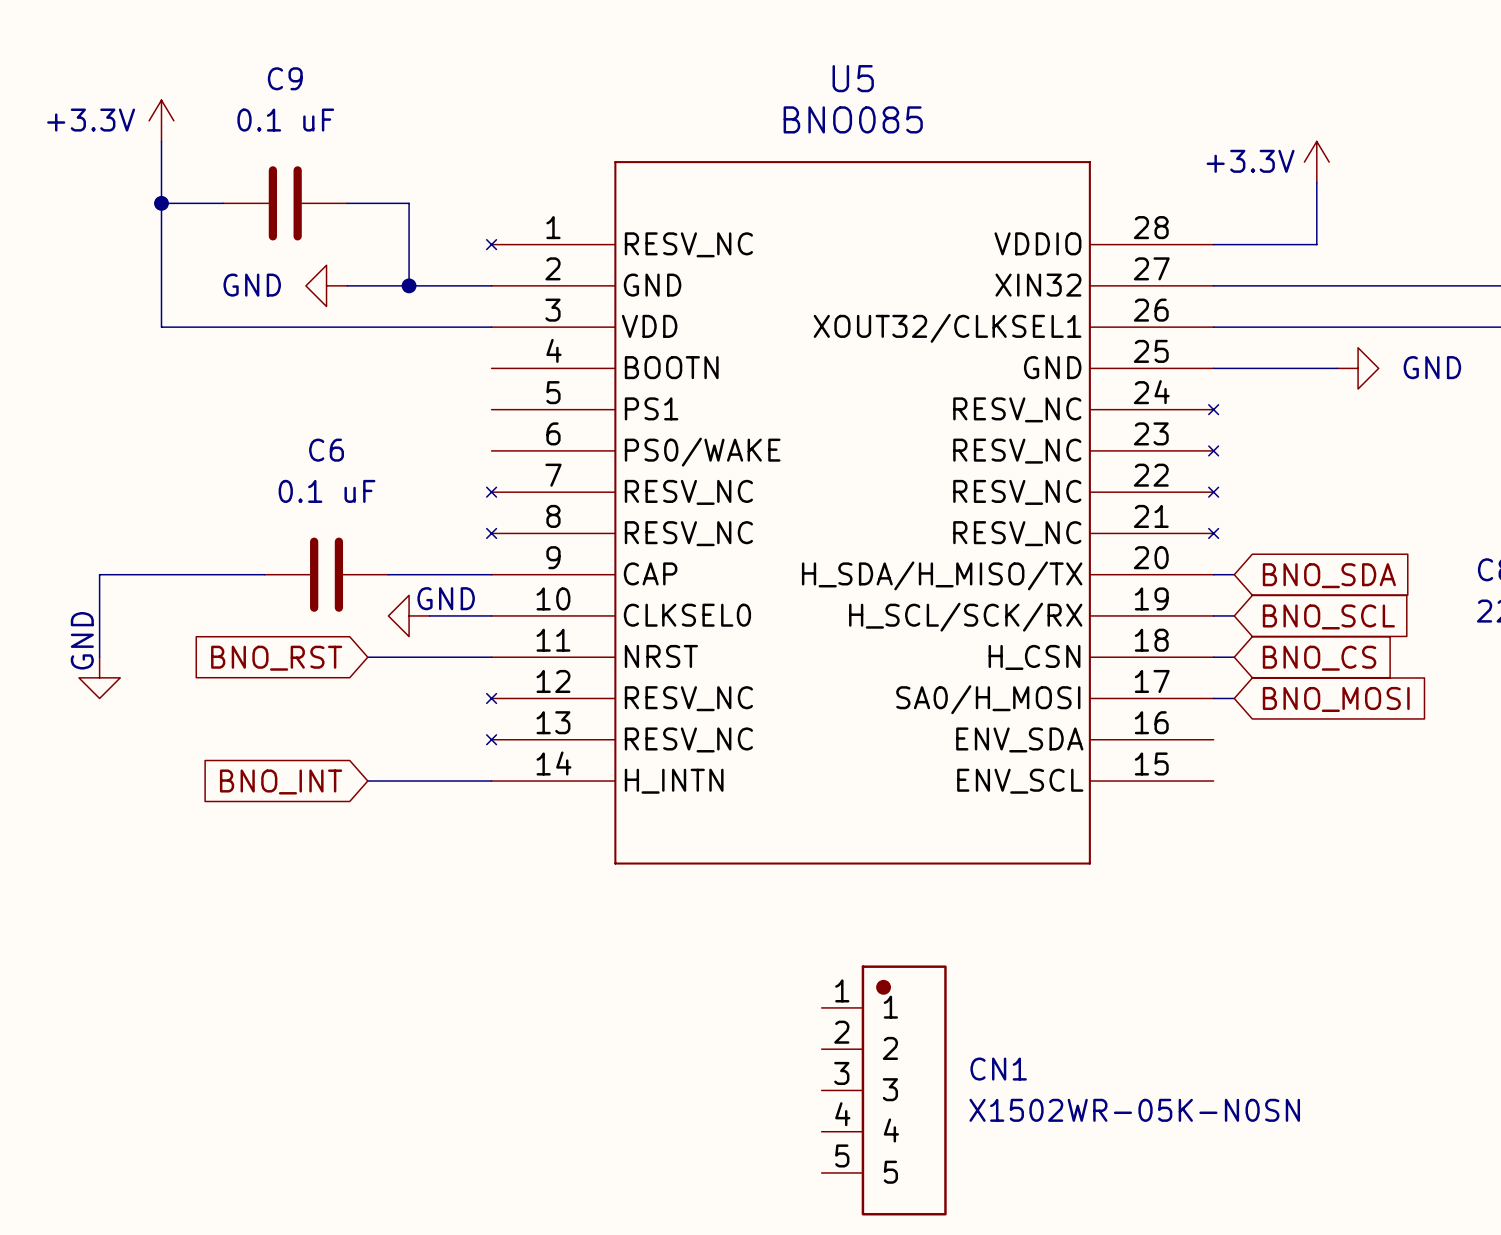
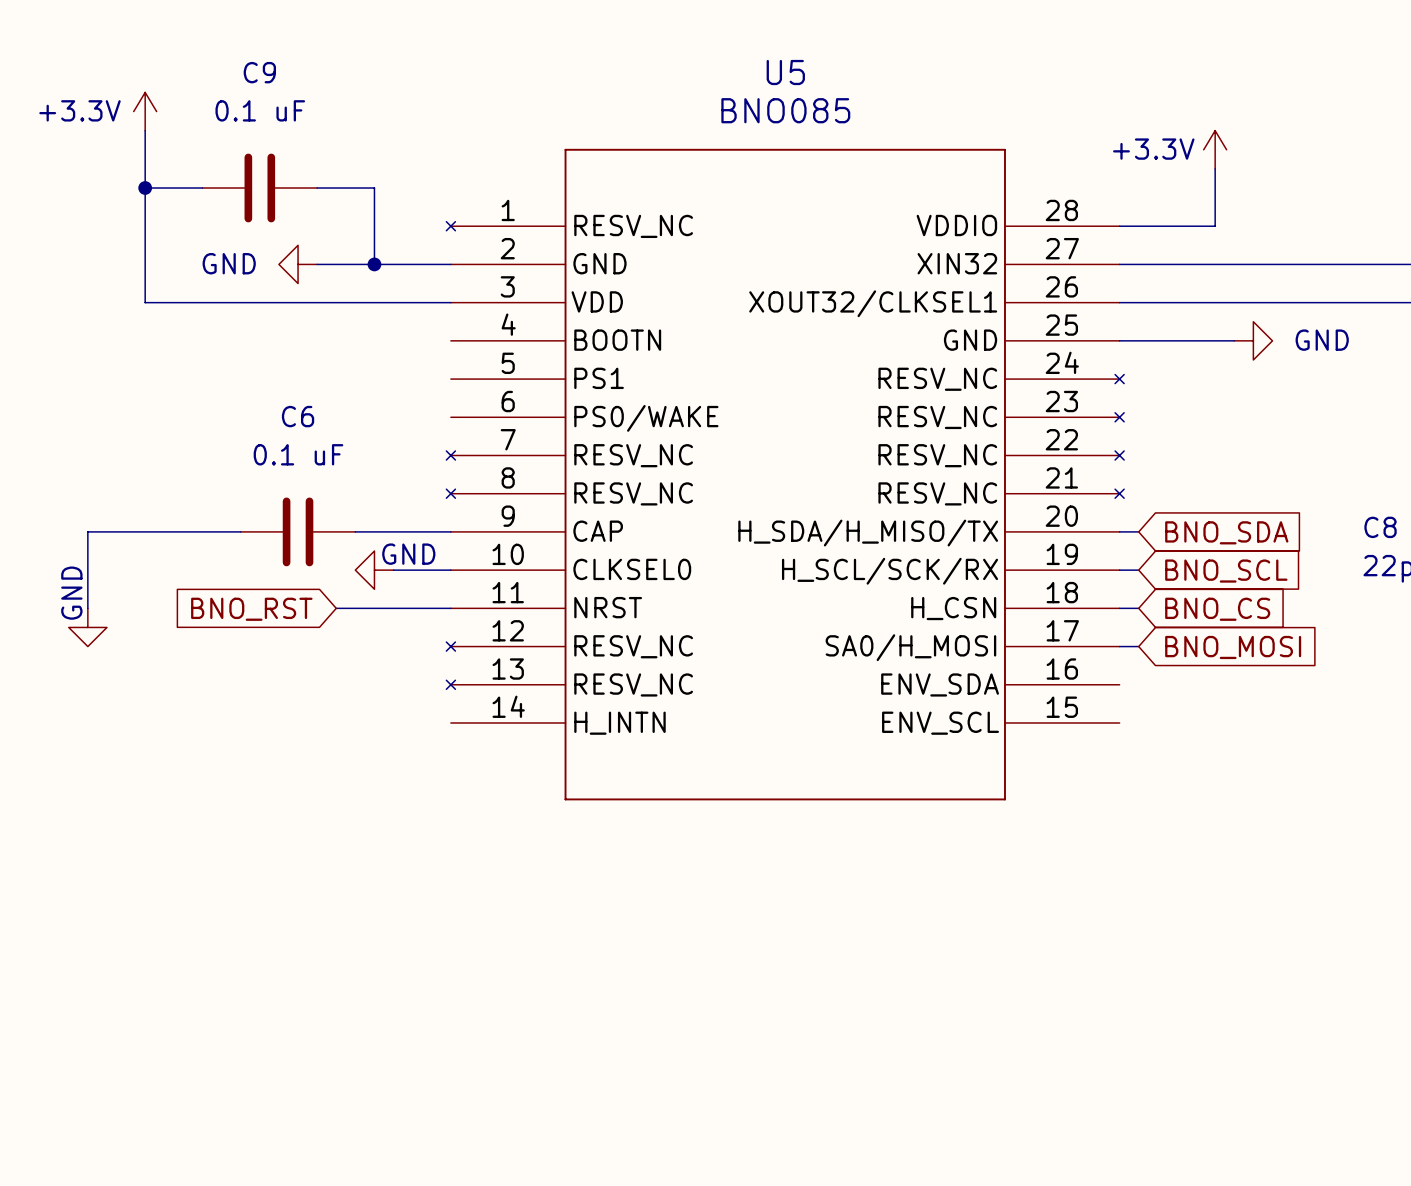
global label: BNO_INT (281, 781) -> none
wire: (367, 781) (491, 781) -> none
CN1: X1502WR-05K-N0SN (884, 1090) -> none

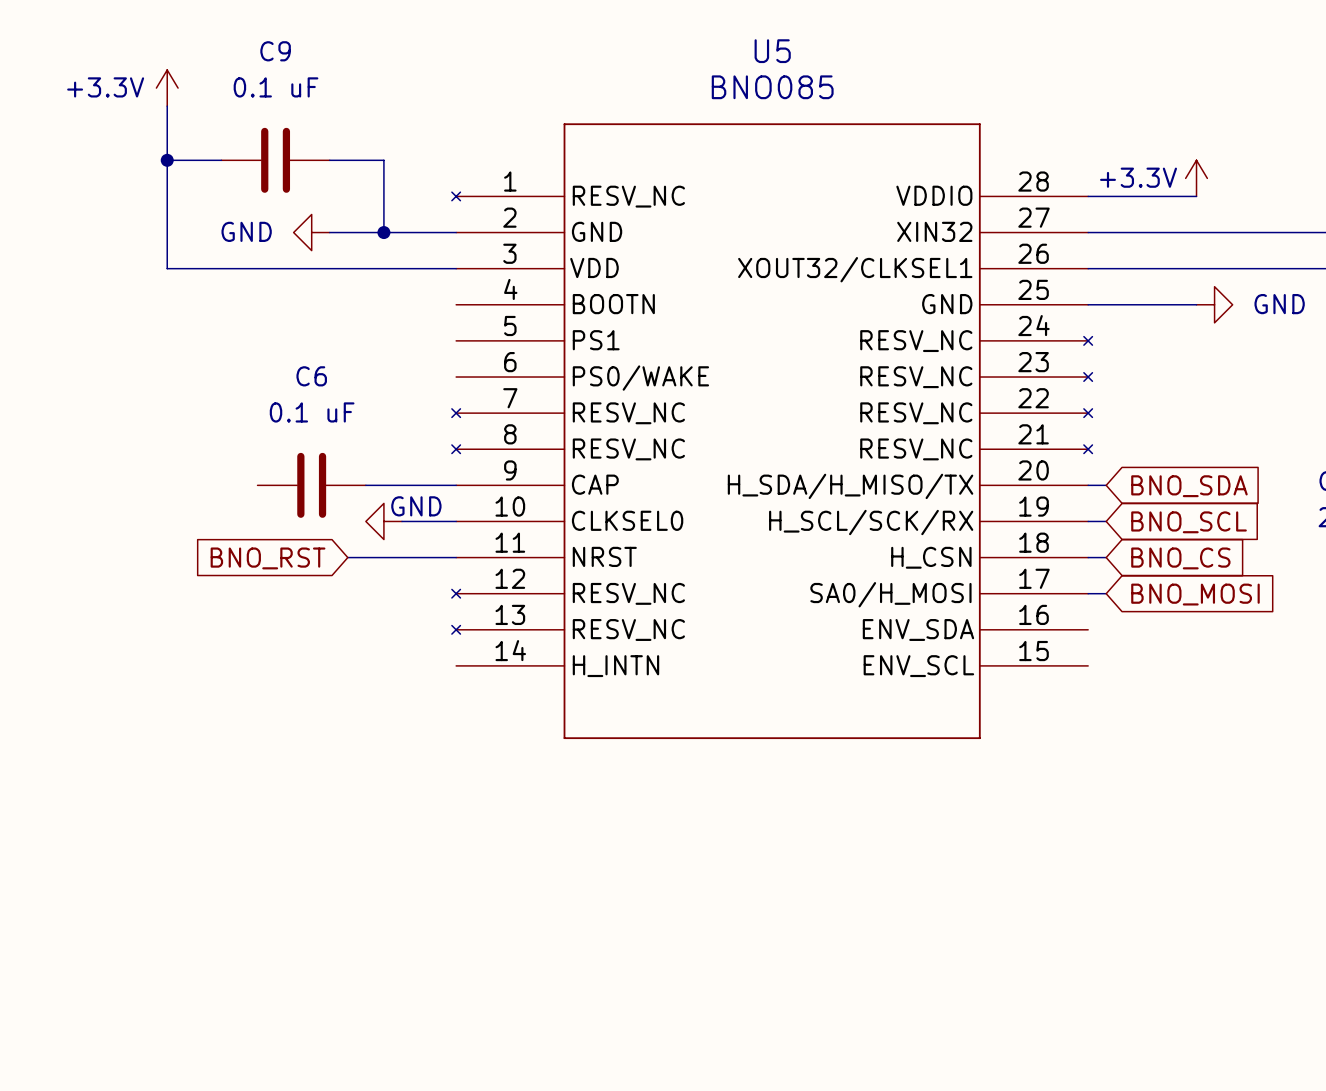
power symbol position: +3.3V (1215, 149) -> +3.3V (1196, 178)
wire: (1215, 168) (1215, 226) -> (1196, 196) (1178, 196)
wire: (240, 531) (87, 531) (87, 608) -> none
power symbol: GND (87, 627) -> none

